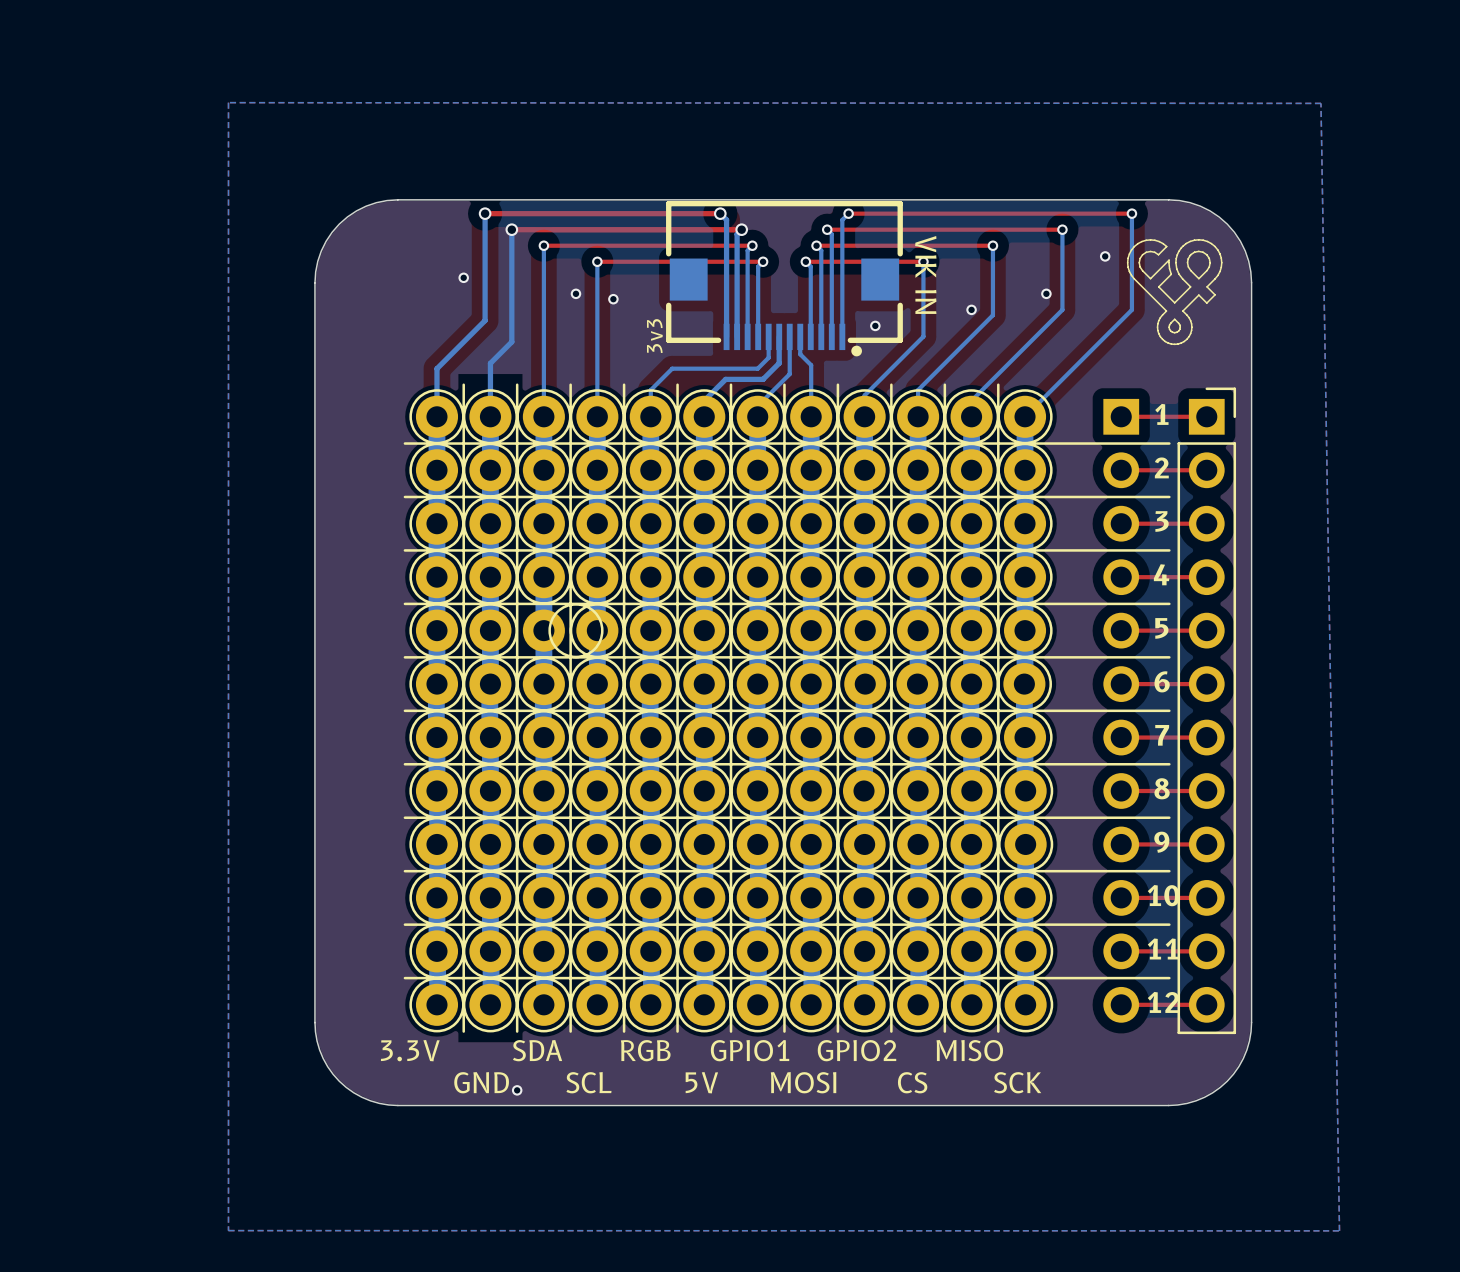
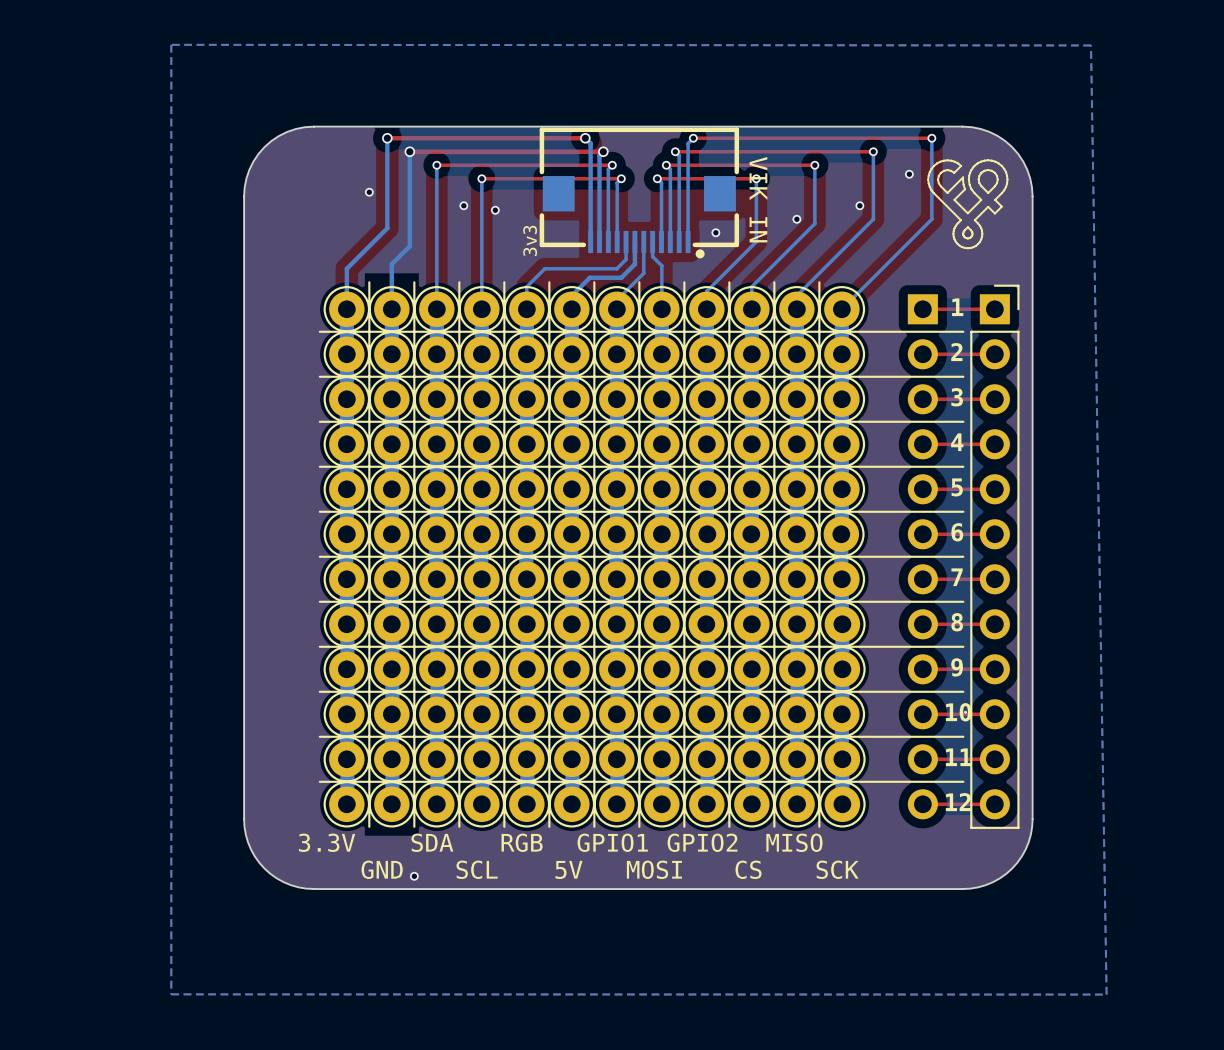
part footprint: [522, 603, 604, 659] -> [413, 466, 460, 513]

